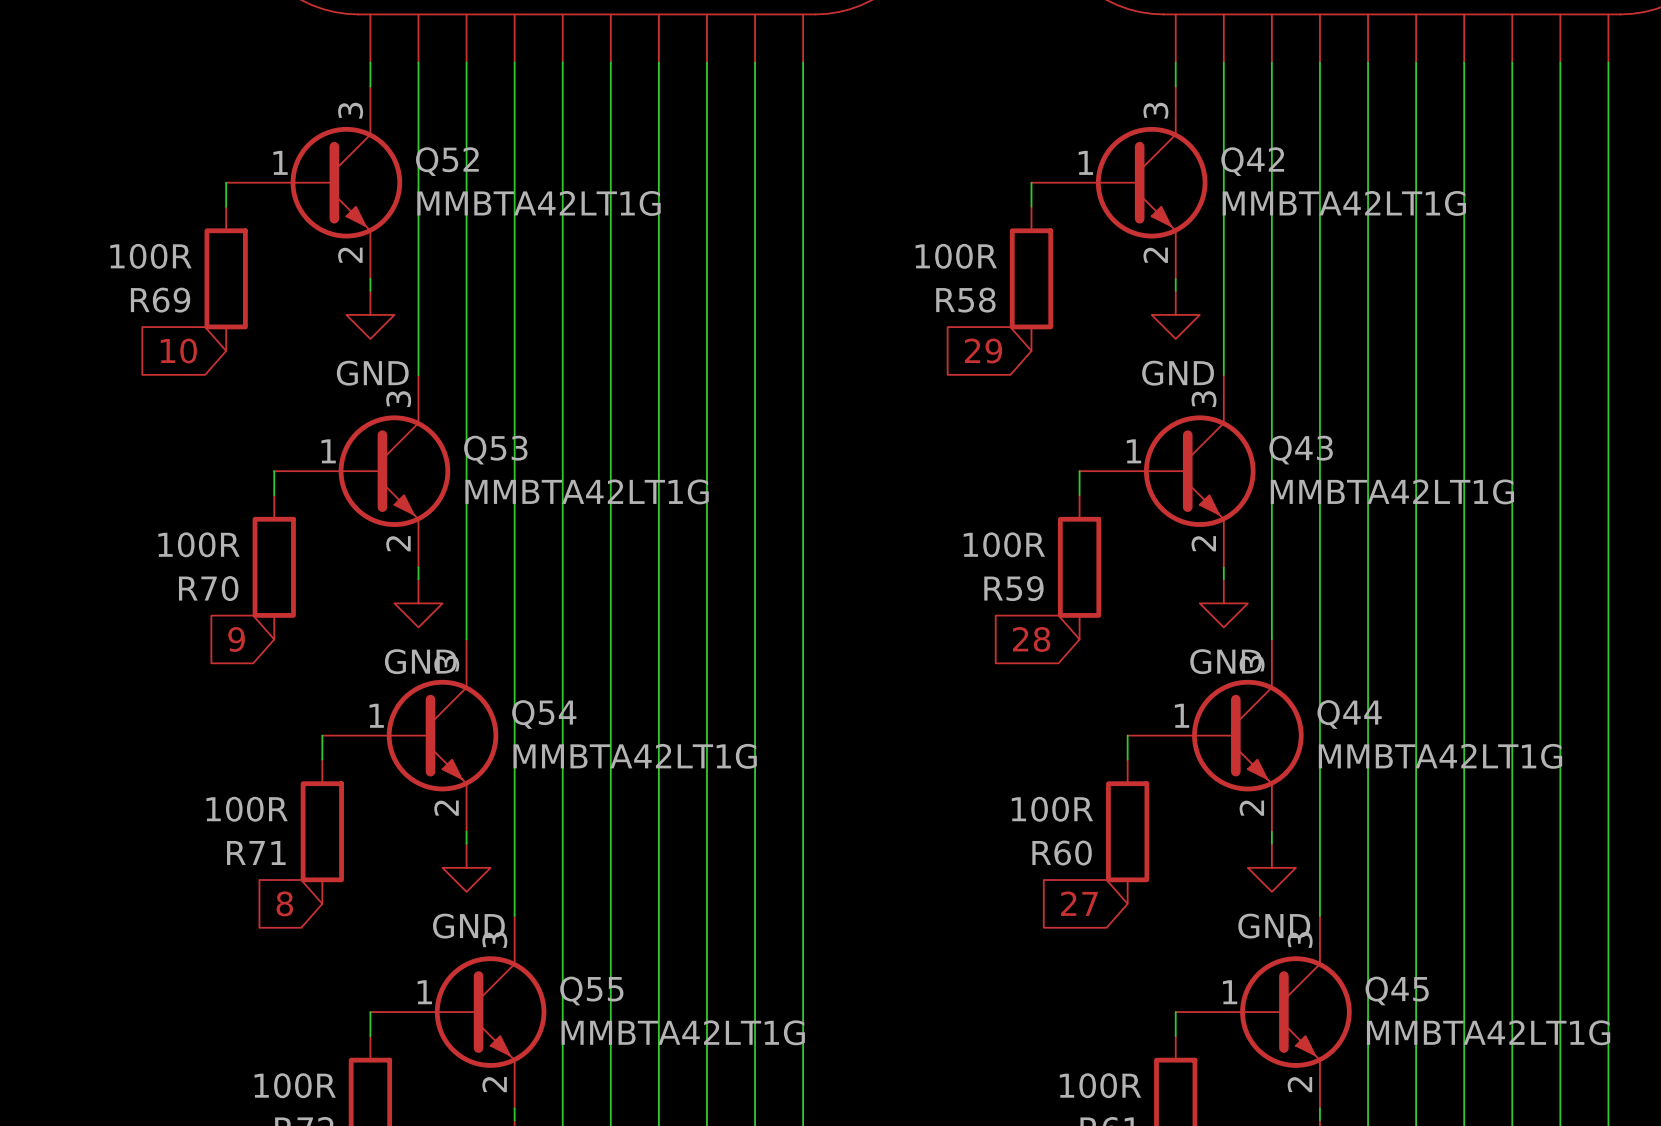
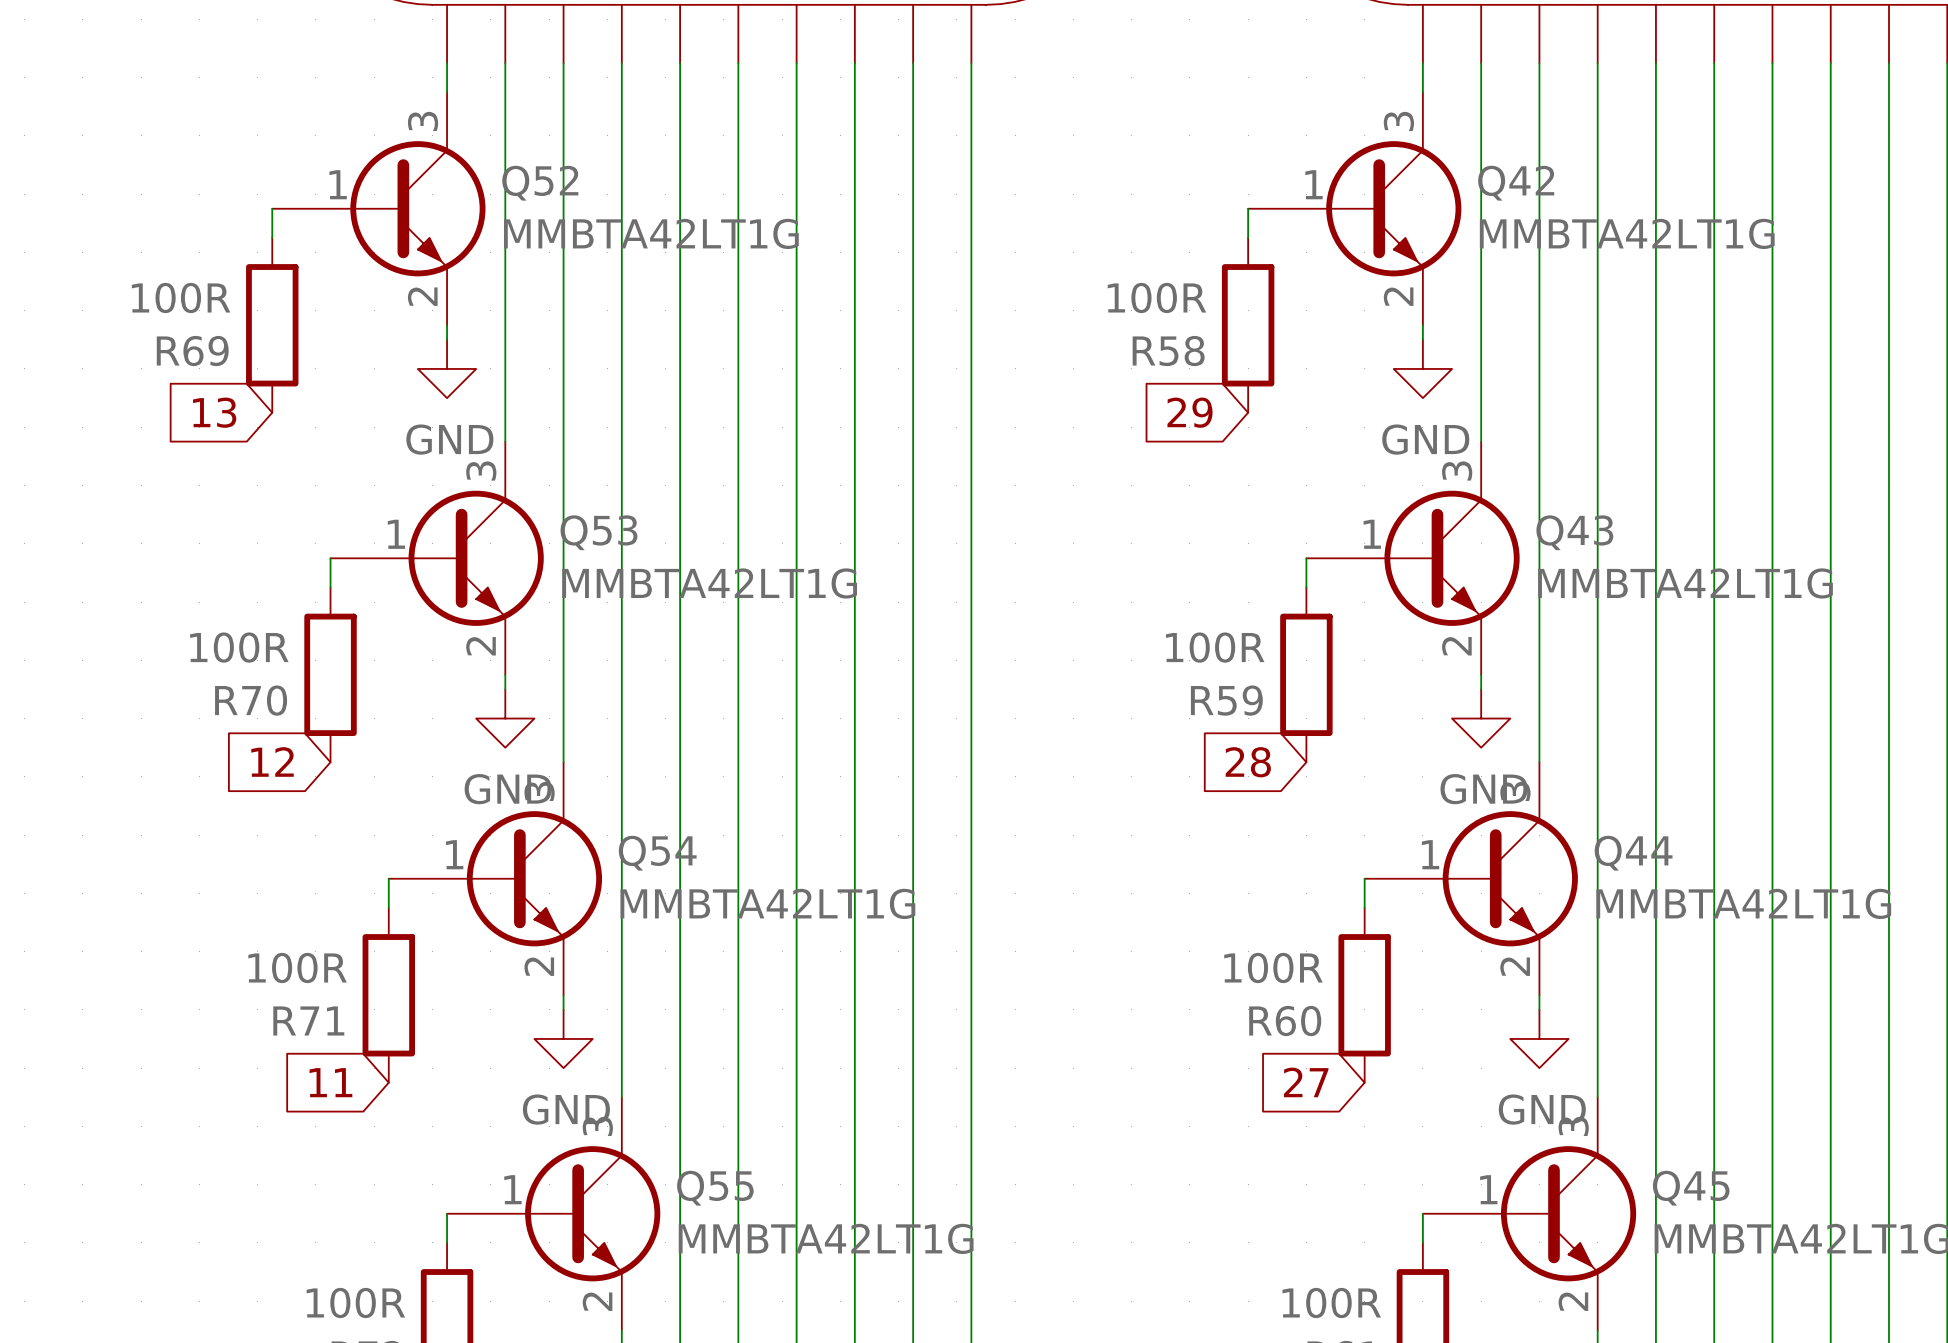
global label: 10 (178, 351) -> 13 (214, 412)
global label: 9 (236, 639) -> 12 (272, 761)
global label: 8 (284, 903) -> 11 (330, 1082)

